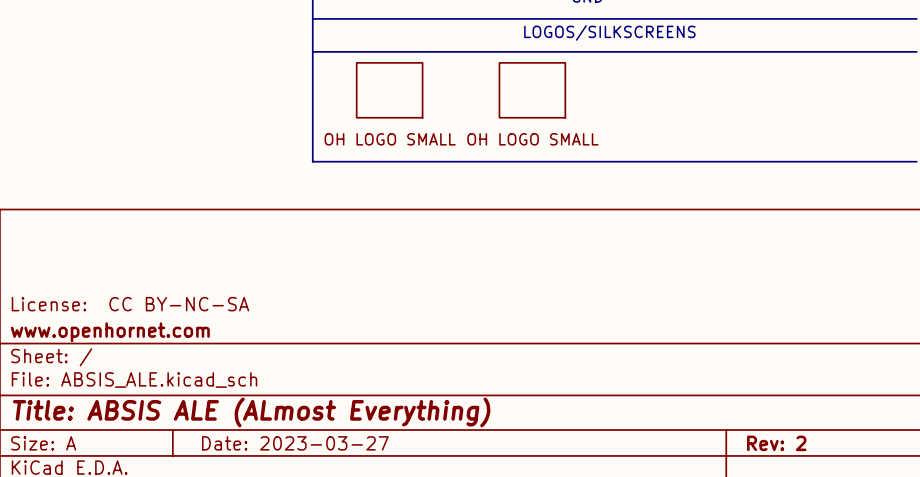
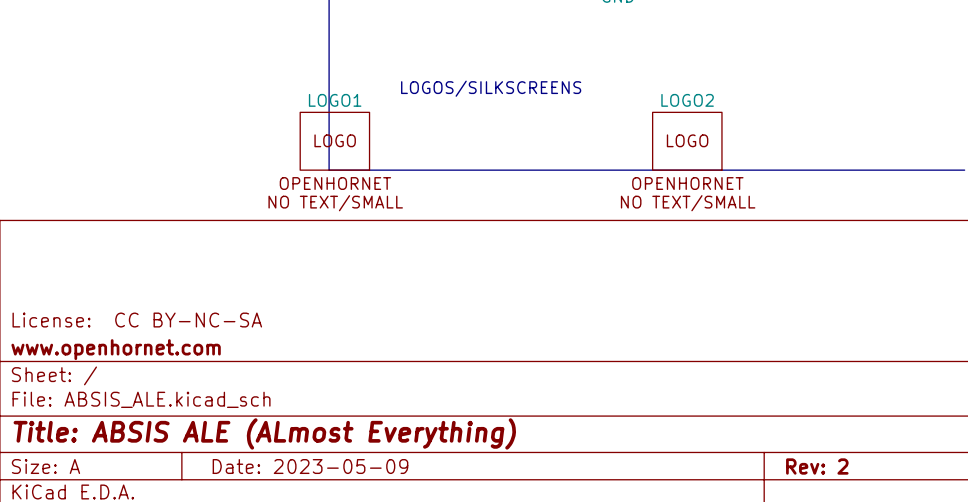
line: (312, 18) (916, 18) -> none
text position: LOGOS/SILKSCREENS (609, 32) -> LOGOS/SILKSCREENS (491, 88)
line: (312, 51) (916, 51) -> none
part: (389, 90) -> none
part: (532, 90) -> none
LOGO1: none -> (334, 141)
LOGO2: none -> (687, 141)
title block: Date: 2023-03-27 (295, 443) -> Date: 2023-05-09 (310, 466)

